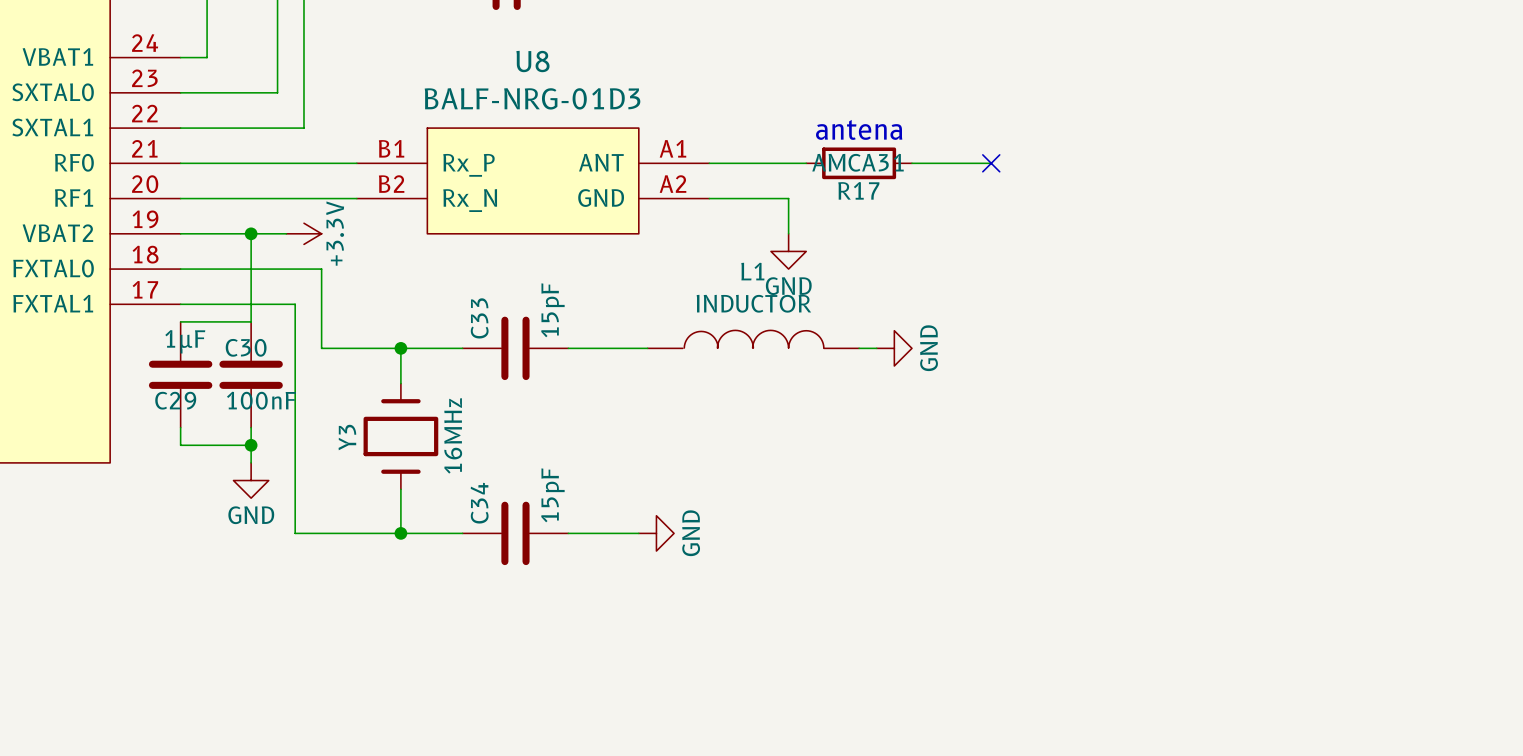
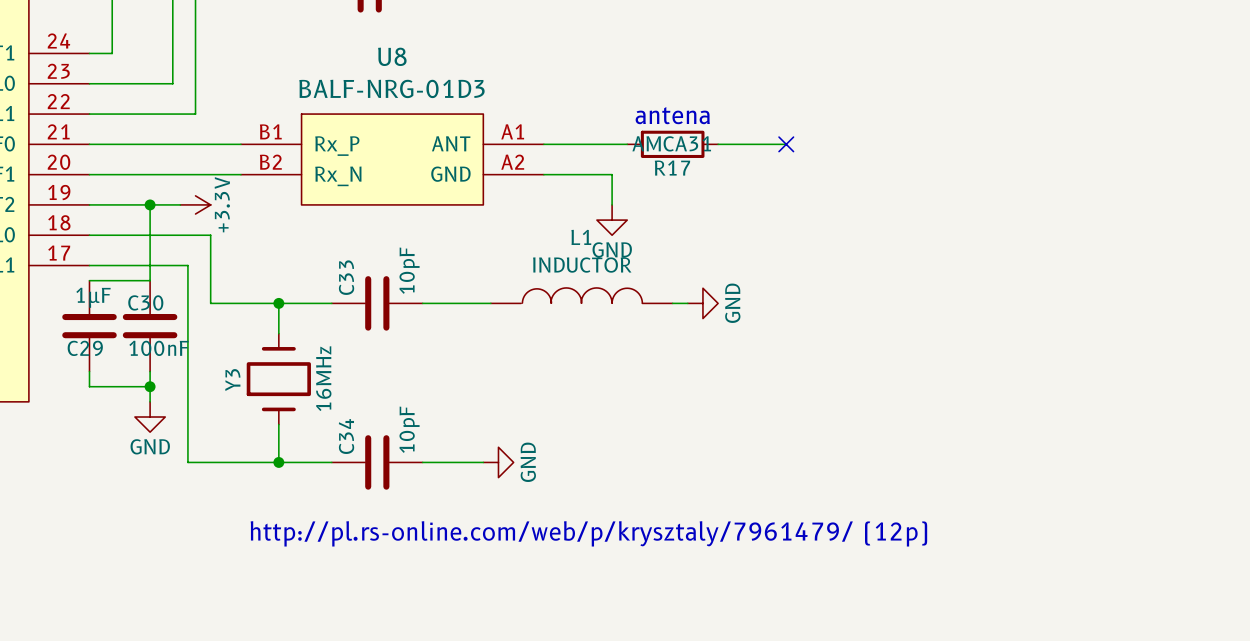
C33 value: 15pF (552, 310) -> 10pF (409, 270)
C34 value: 15pF (552, 495) -> 10pF (409, 429)
text: none -> http://pl.rs-online.com/web/p/krysztaly/7961479/ (12p) (588, 533)

